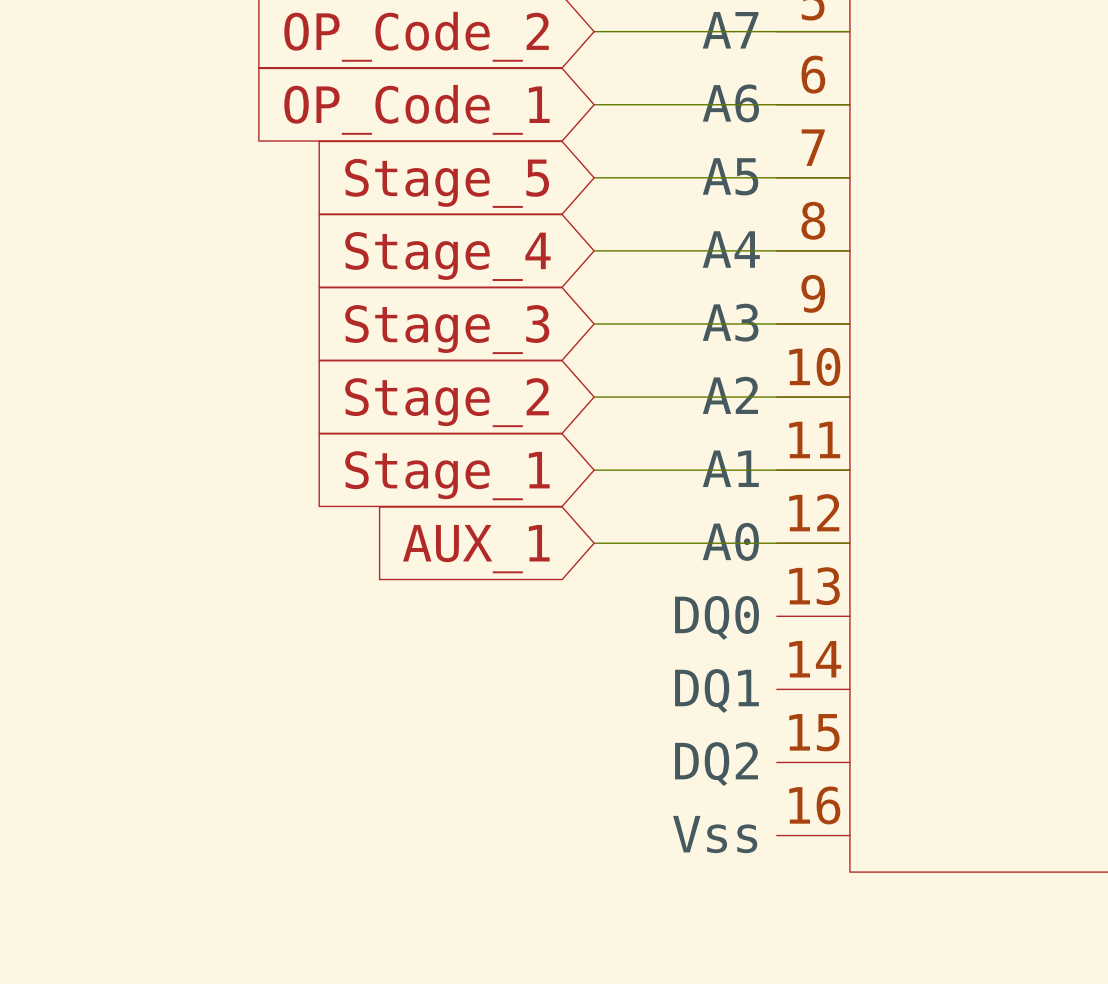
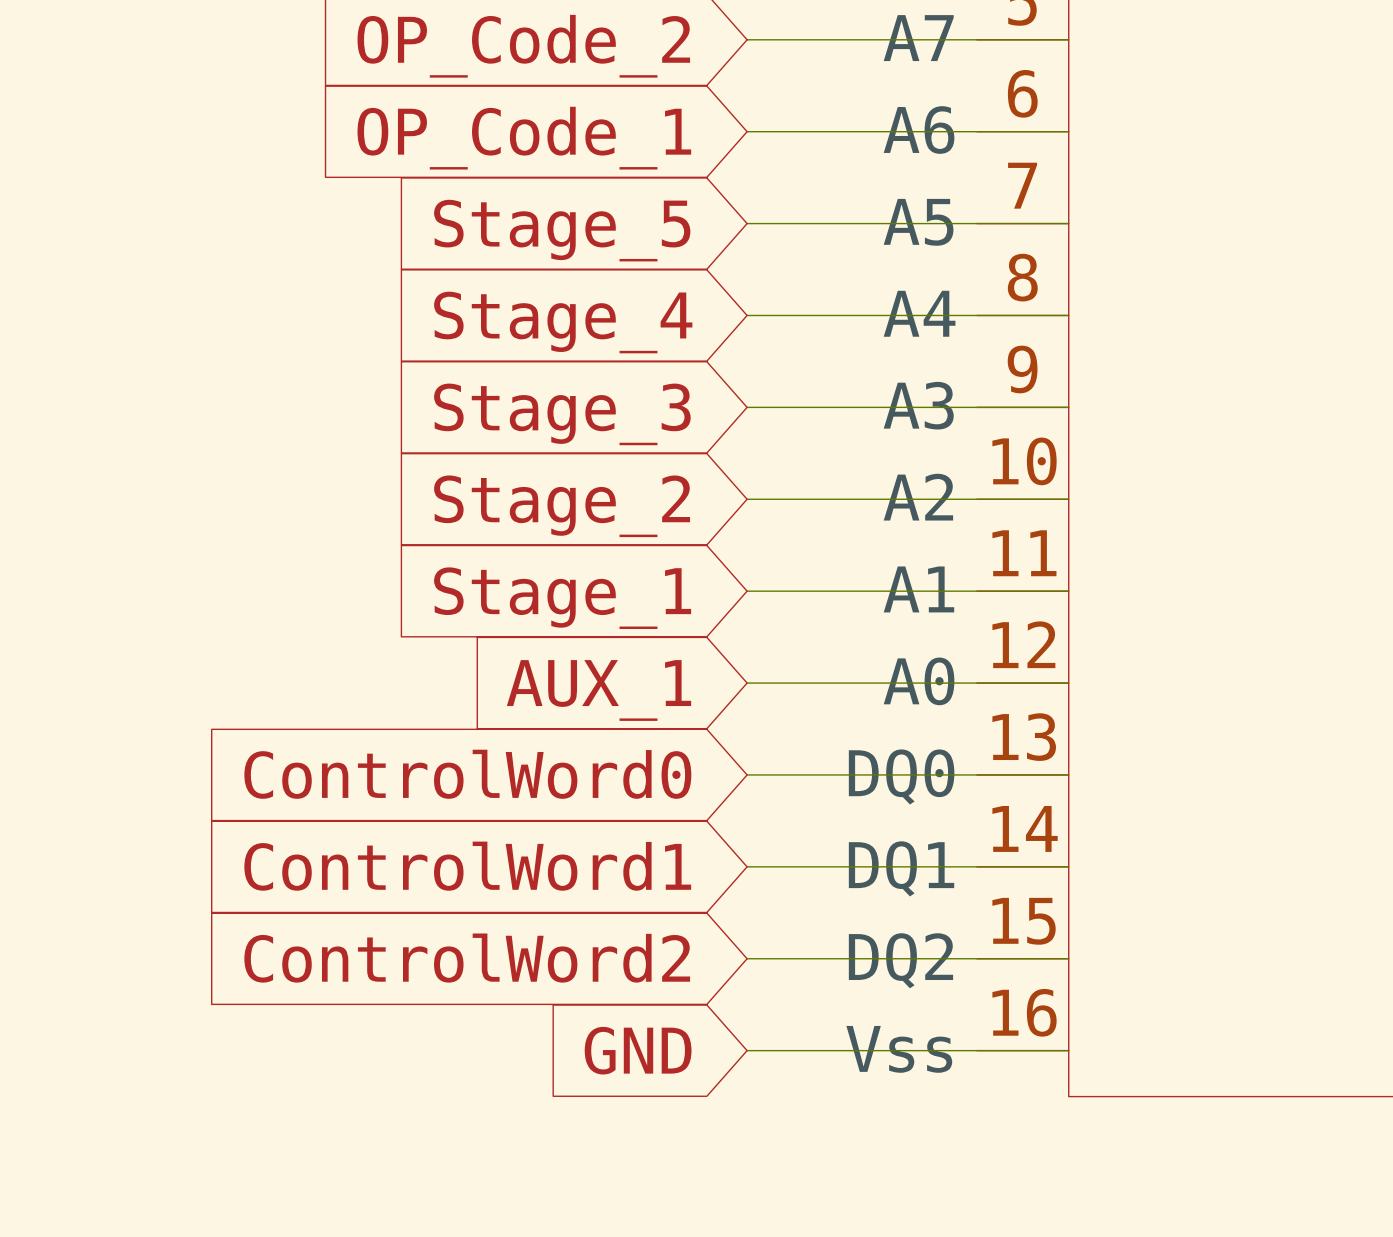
global label: none -> ControlWord0 (467, 774)
wire: none -> (747, 774) (1068, 774)
global label: none -> ControlWord1 (467, 866)
wire: none -> (747, 866) (1068, 866)
global label: none -> ControlWord2 (467, 958)
wire: none -> (747, 958) (1068, 958)
global label: none -> GND (638, 1050)
wire: none -> (747, 1050) (1068, 1050)

